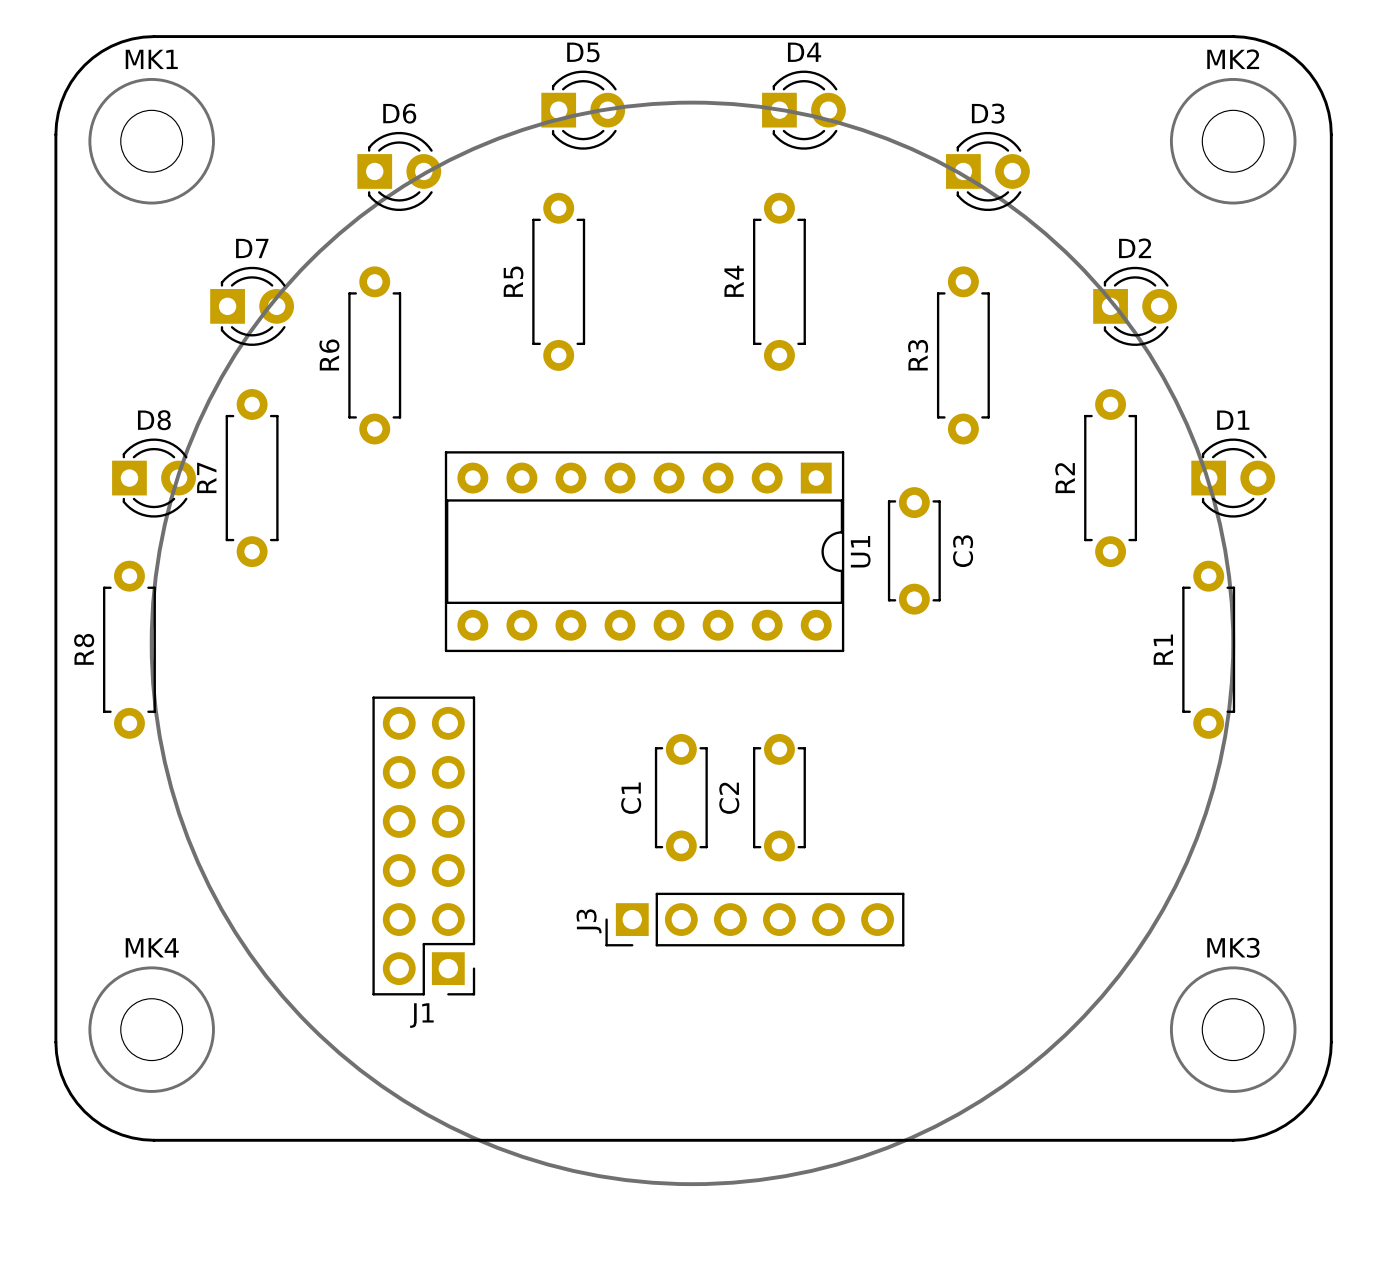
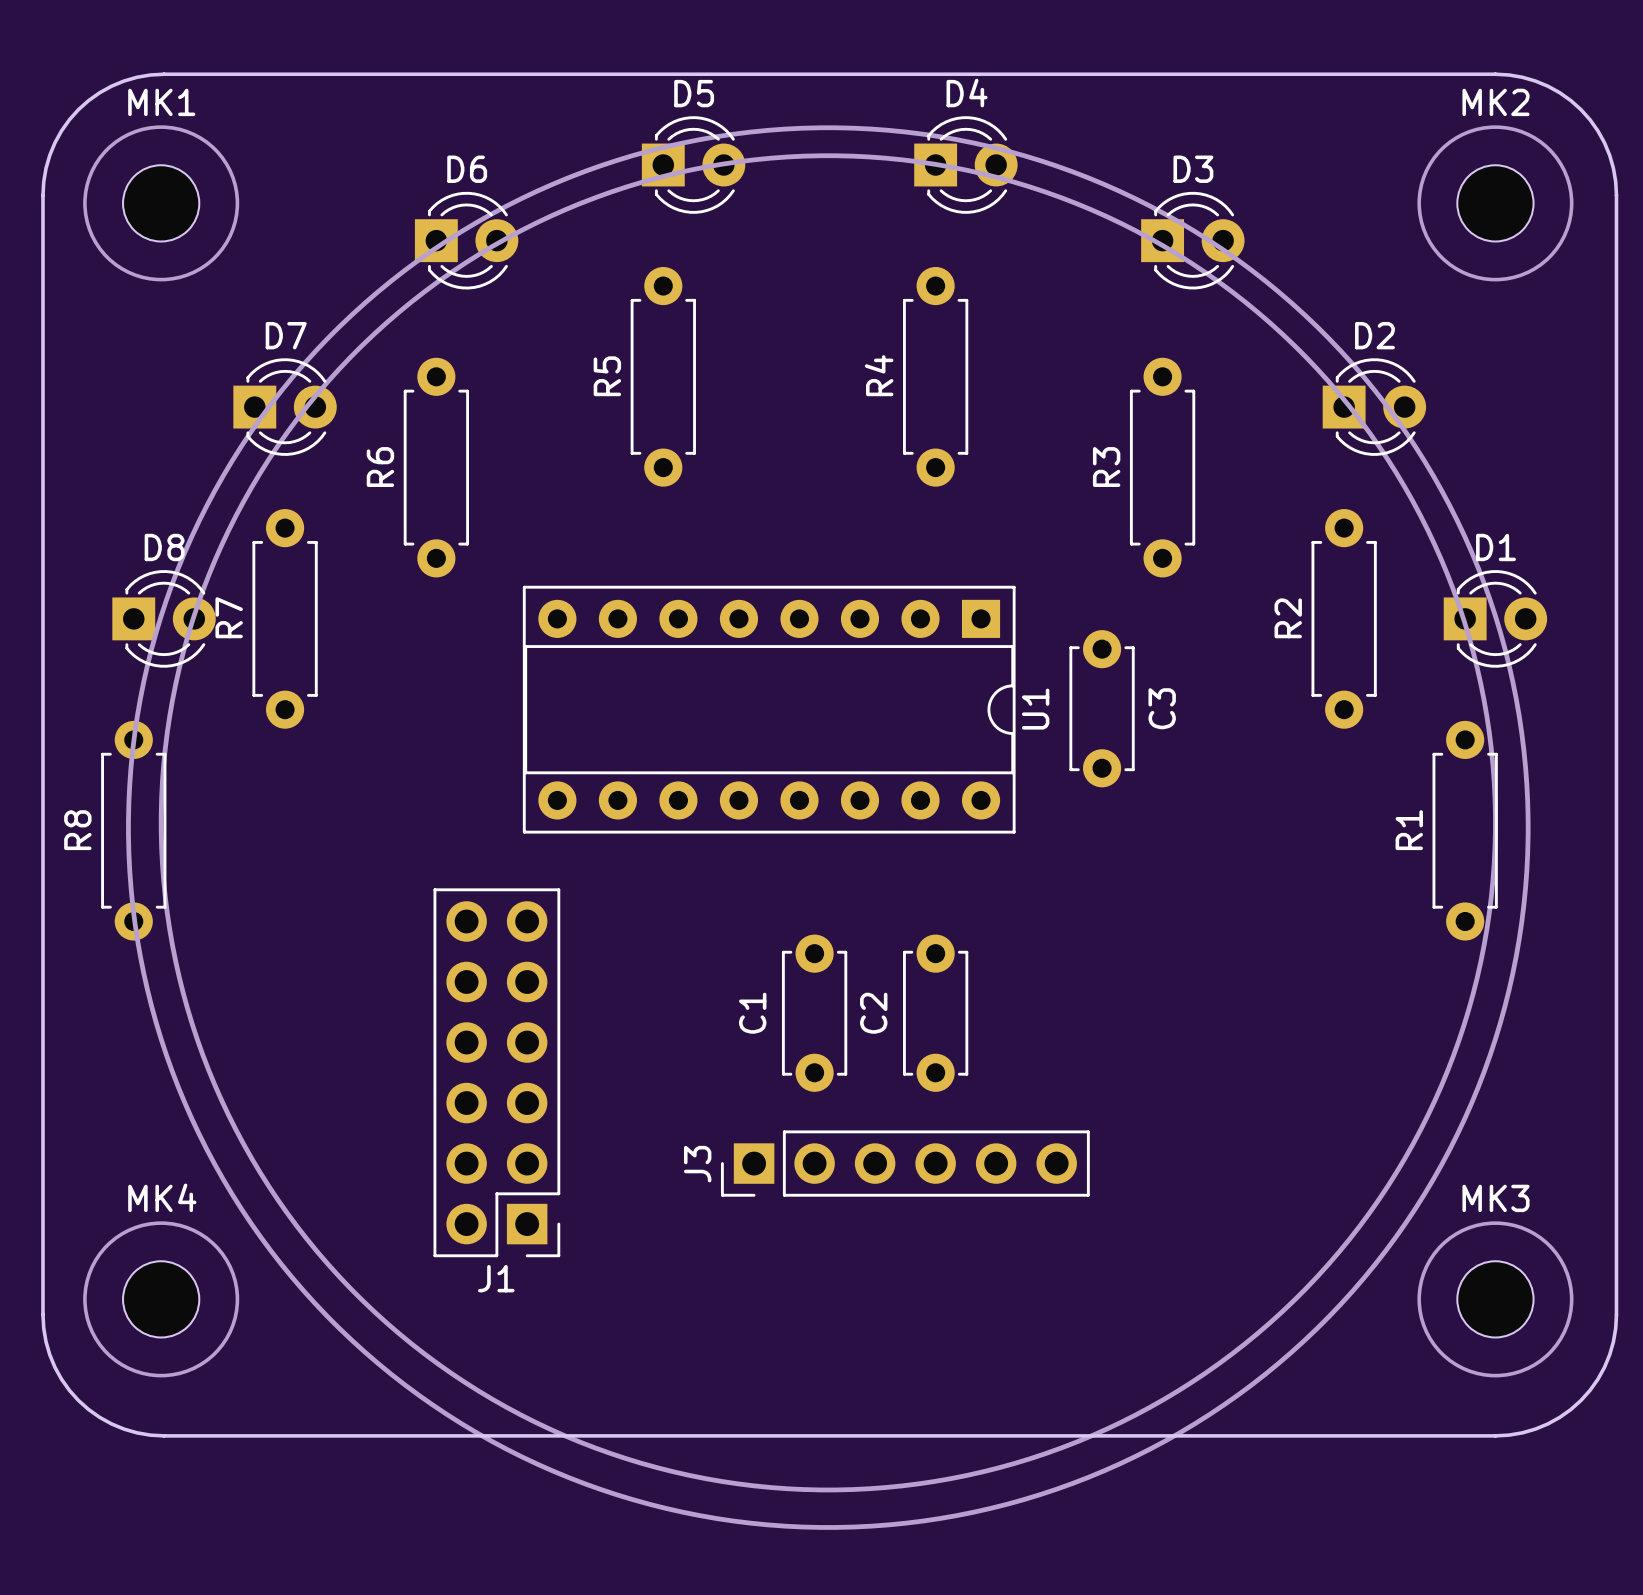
drawing: none -> [126, 125, 1531, 1530]

